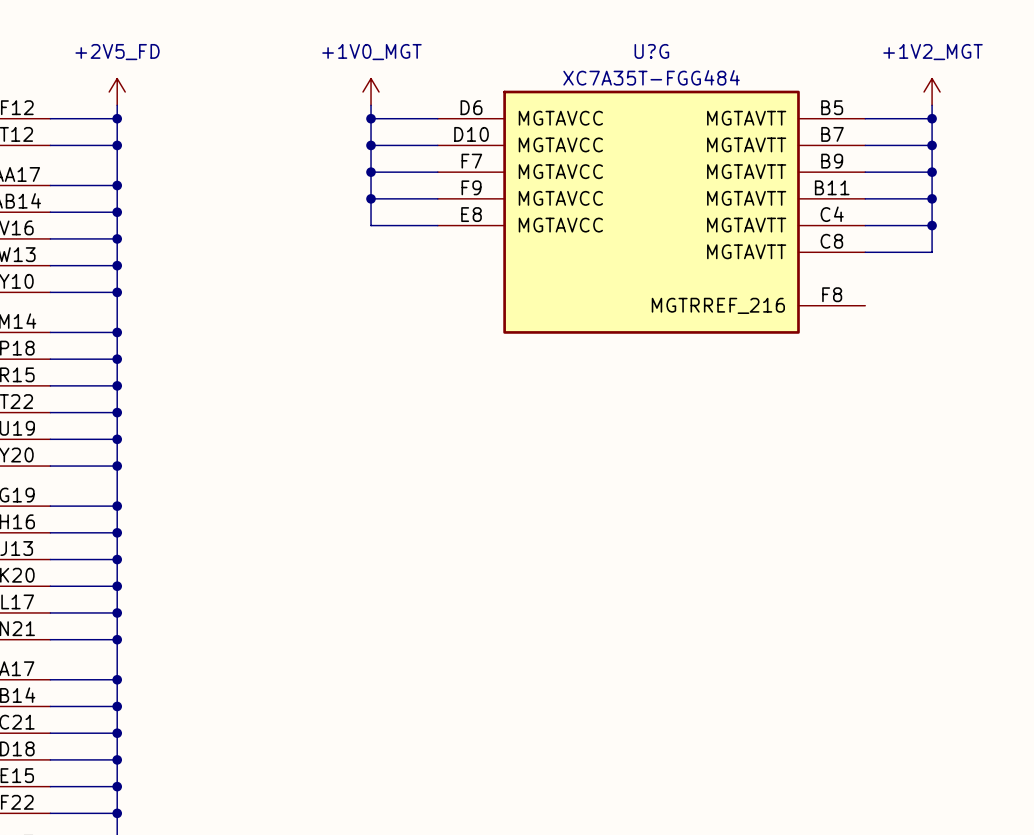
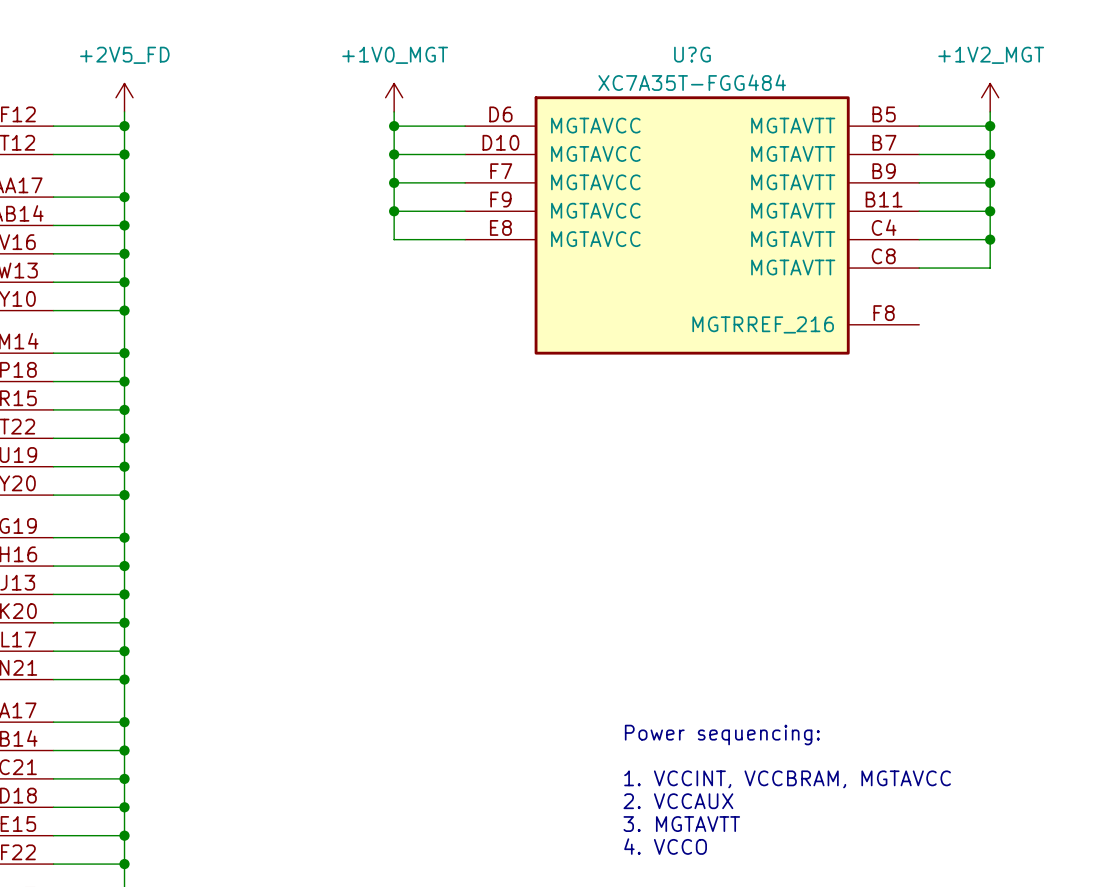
text: none -> Power sequencing: (722, 735)
text: none -> 1. VCCINT, VCCBRAM, MGTAVCC (787, 779)
text: none -> 2. VCCAUX (678, 801)
text: none -> 3. MGTAVTT (681, 824)
text: none -> 4. VCCO (665, 846)

